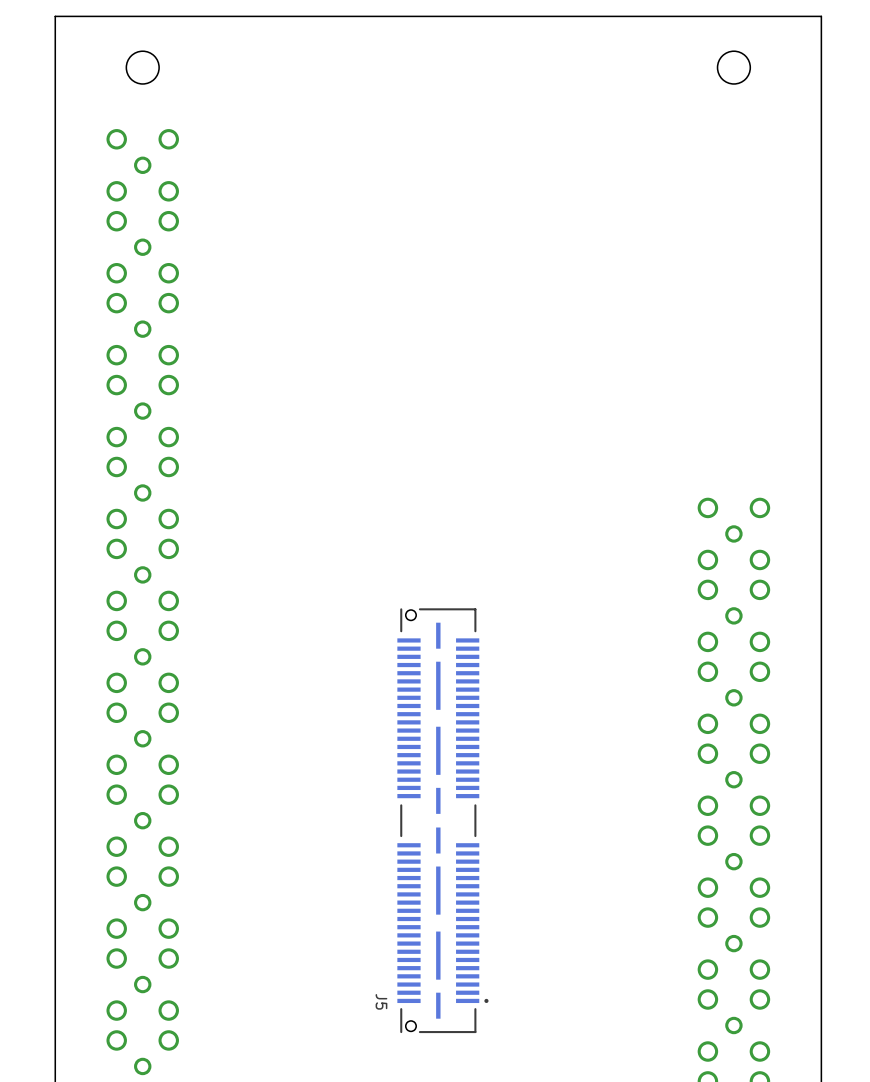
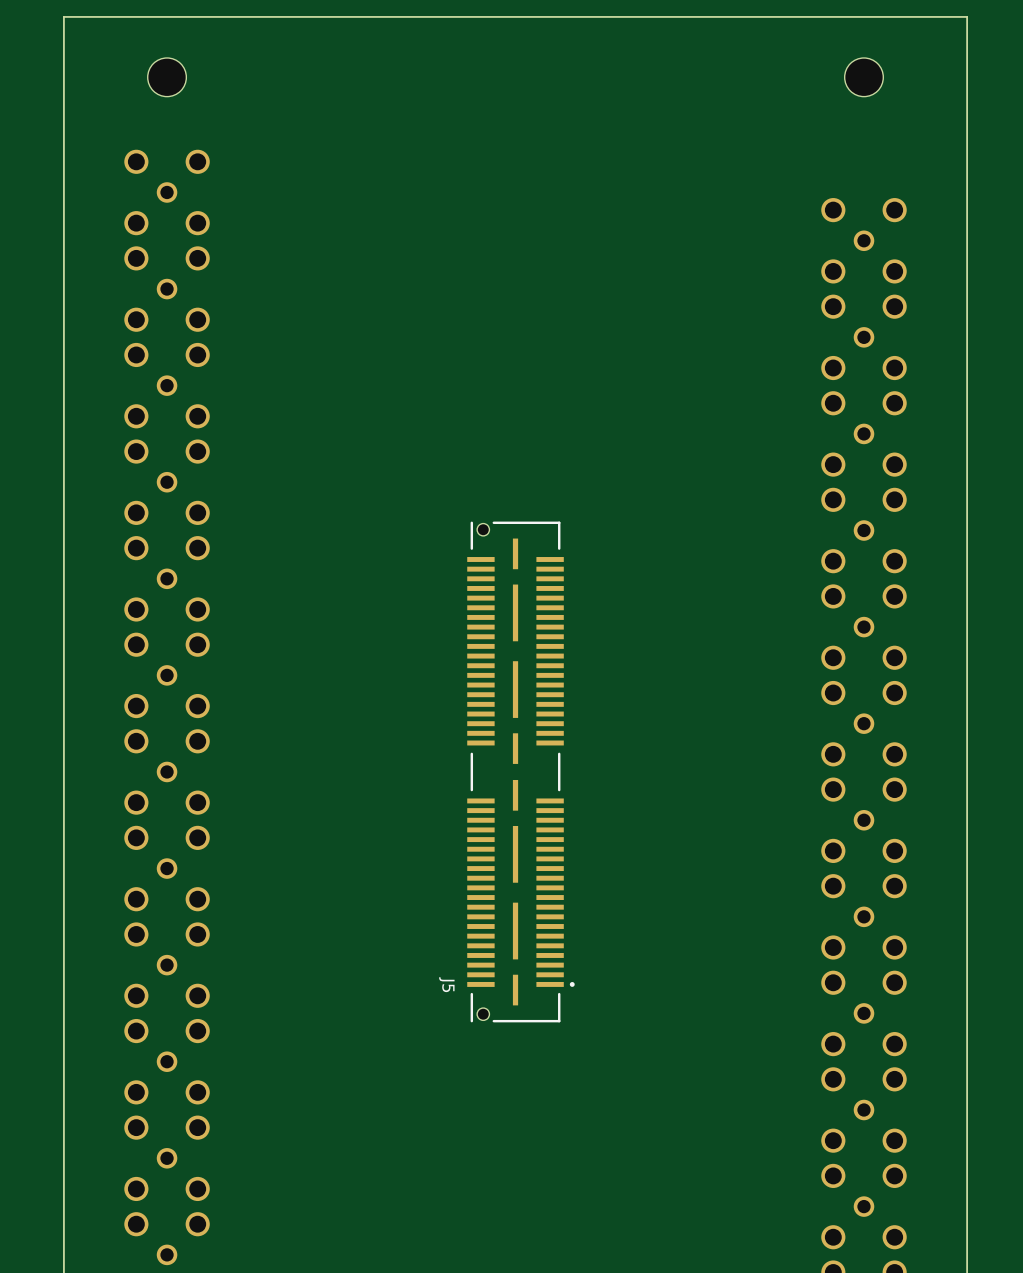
part: none -> (863, 240)
part: none -> (863, 337)
part: none -> (863, 433)
part: none -> (863, 530)
J5 position: (442, 820) -> (520, 771)

